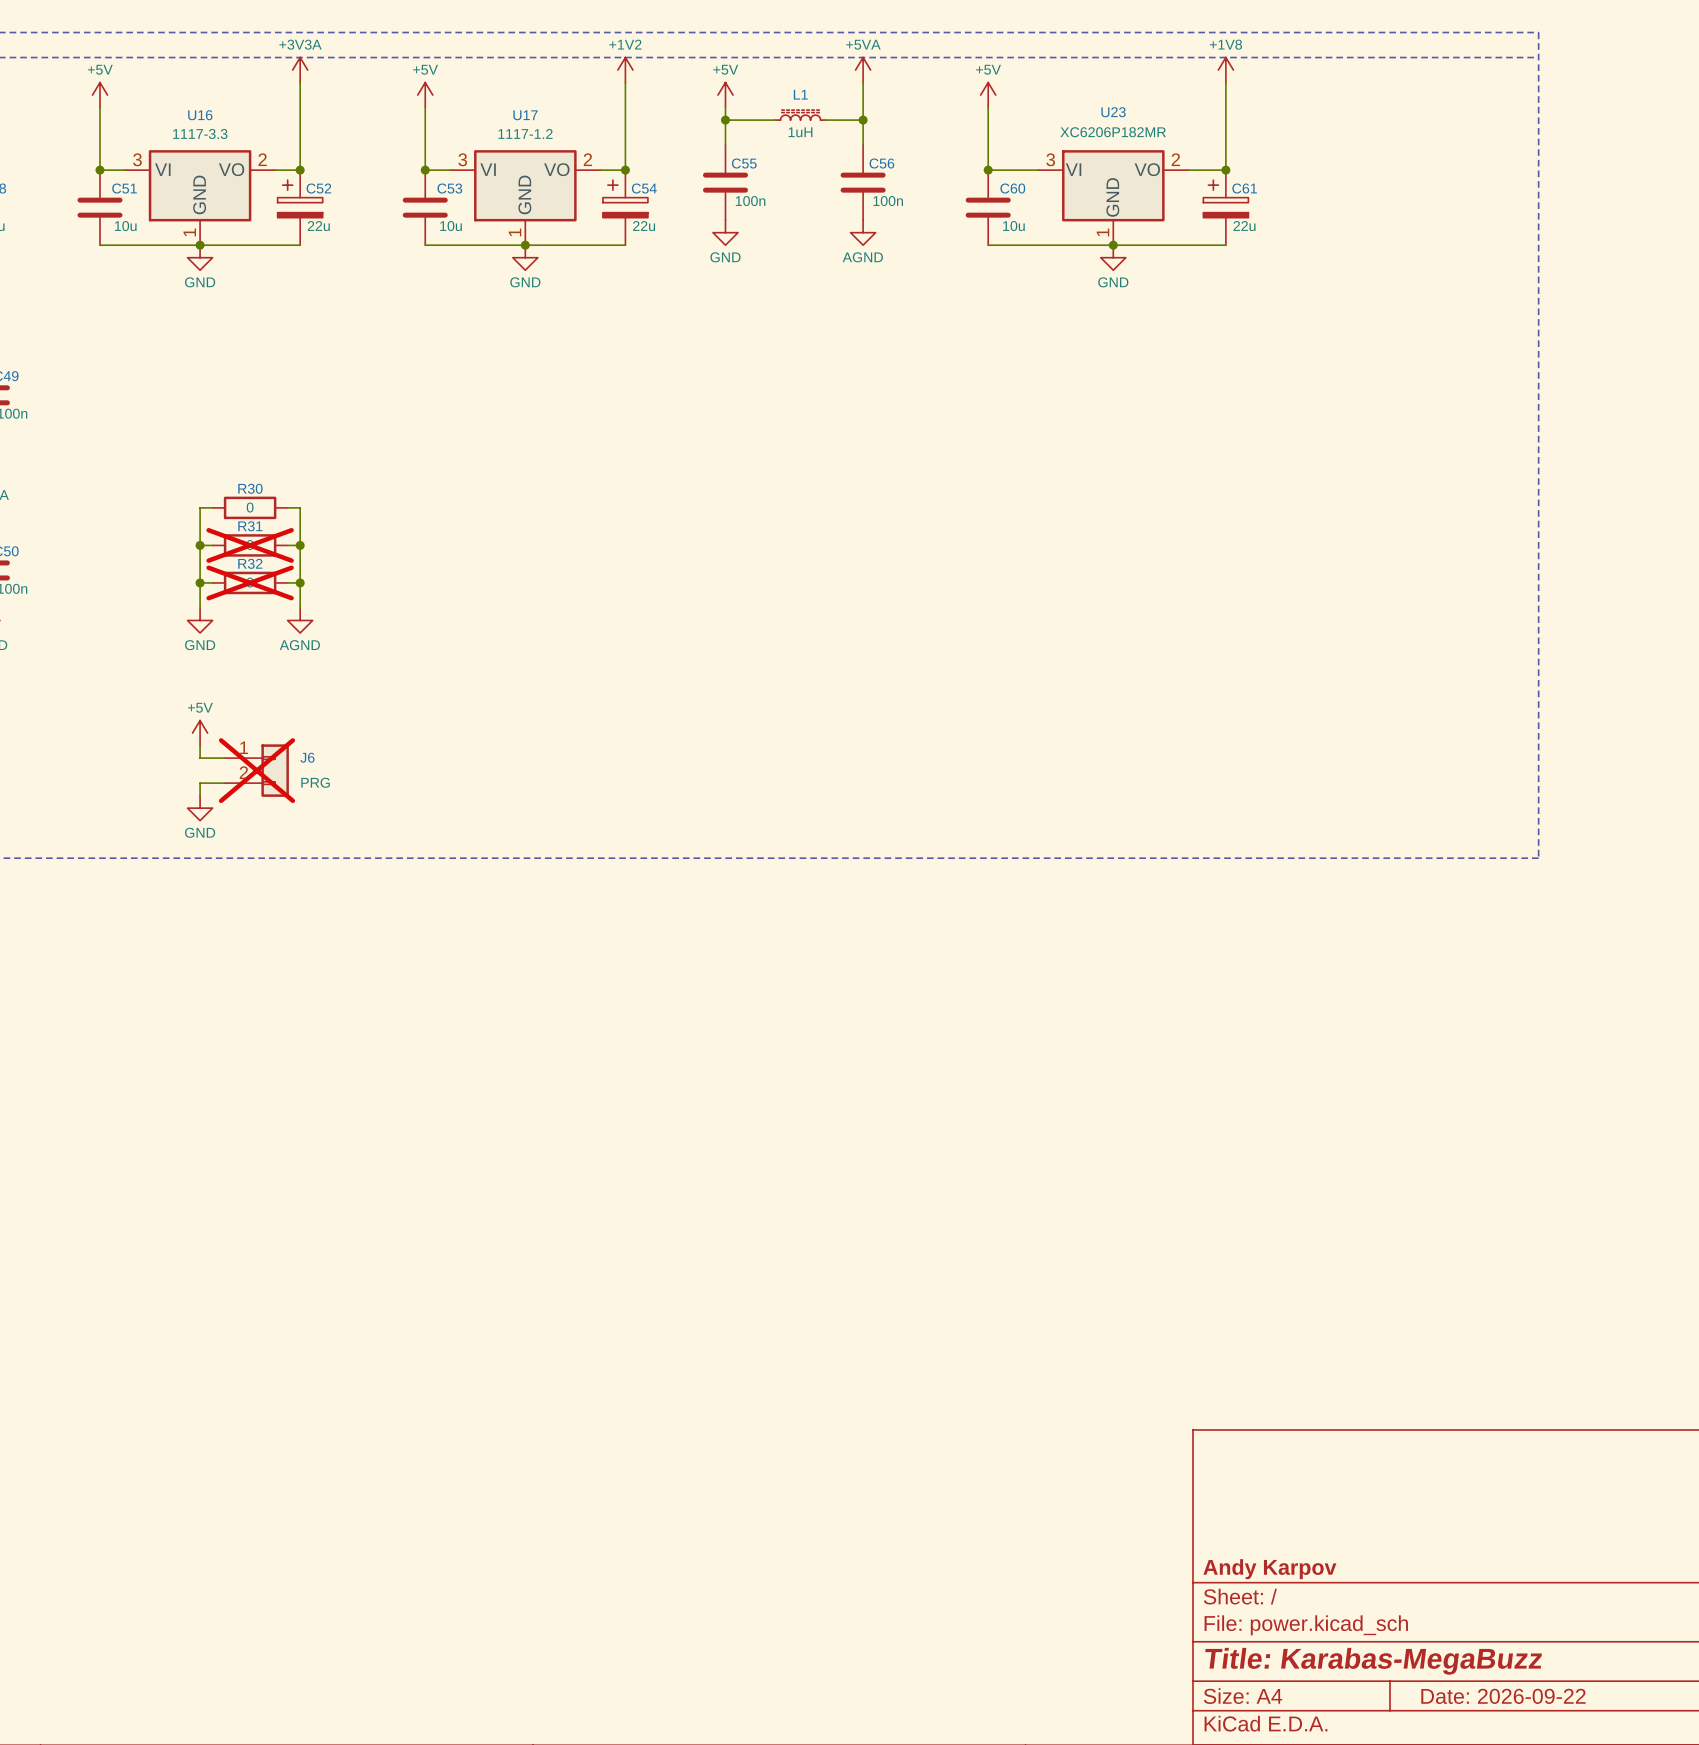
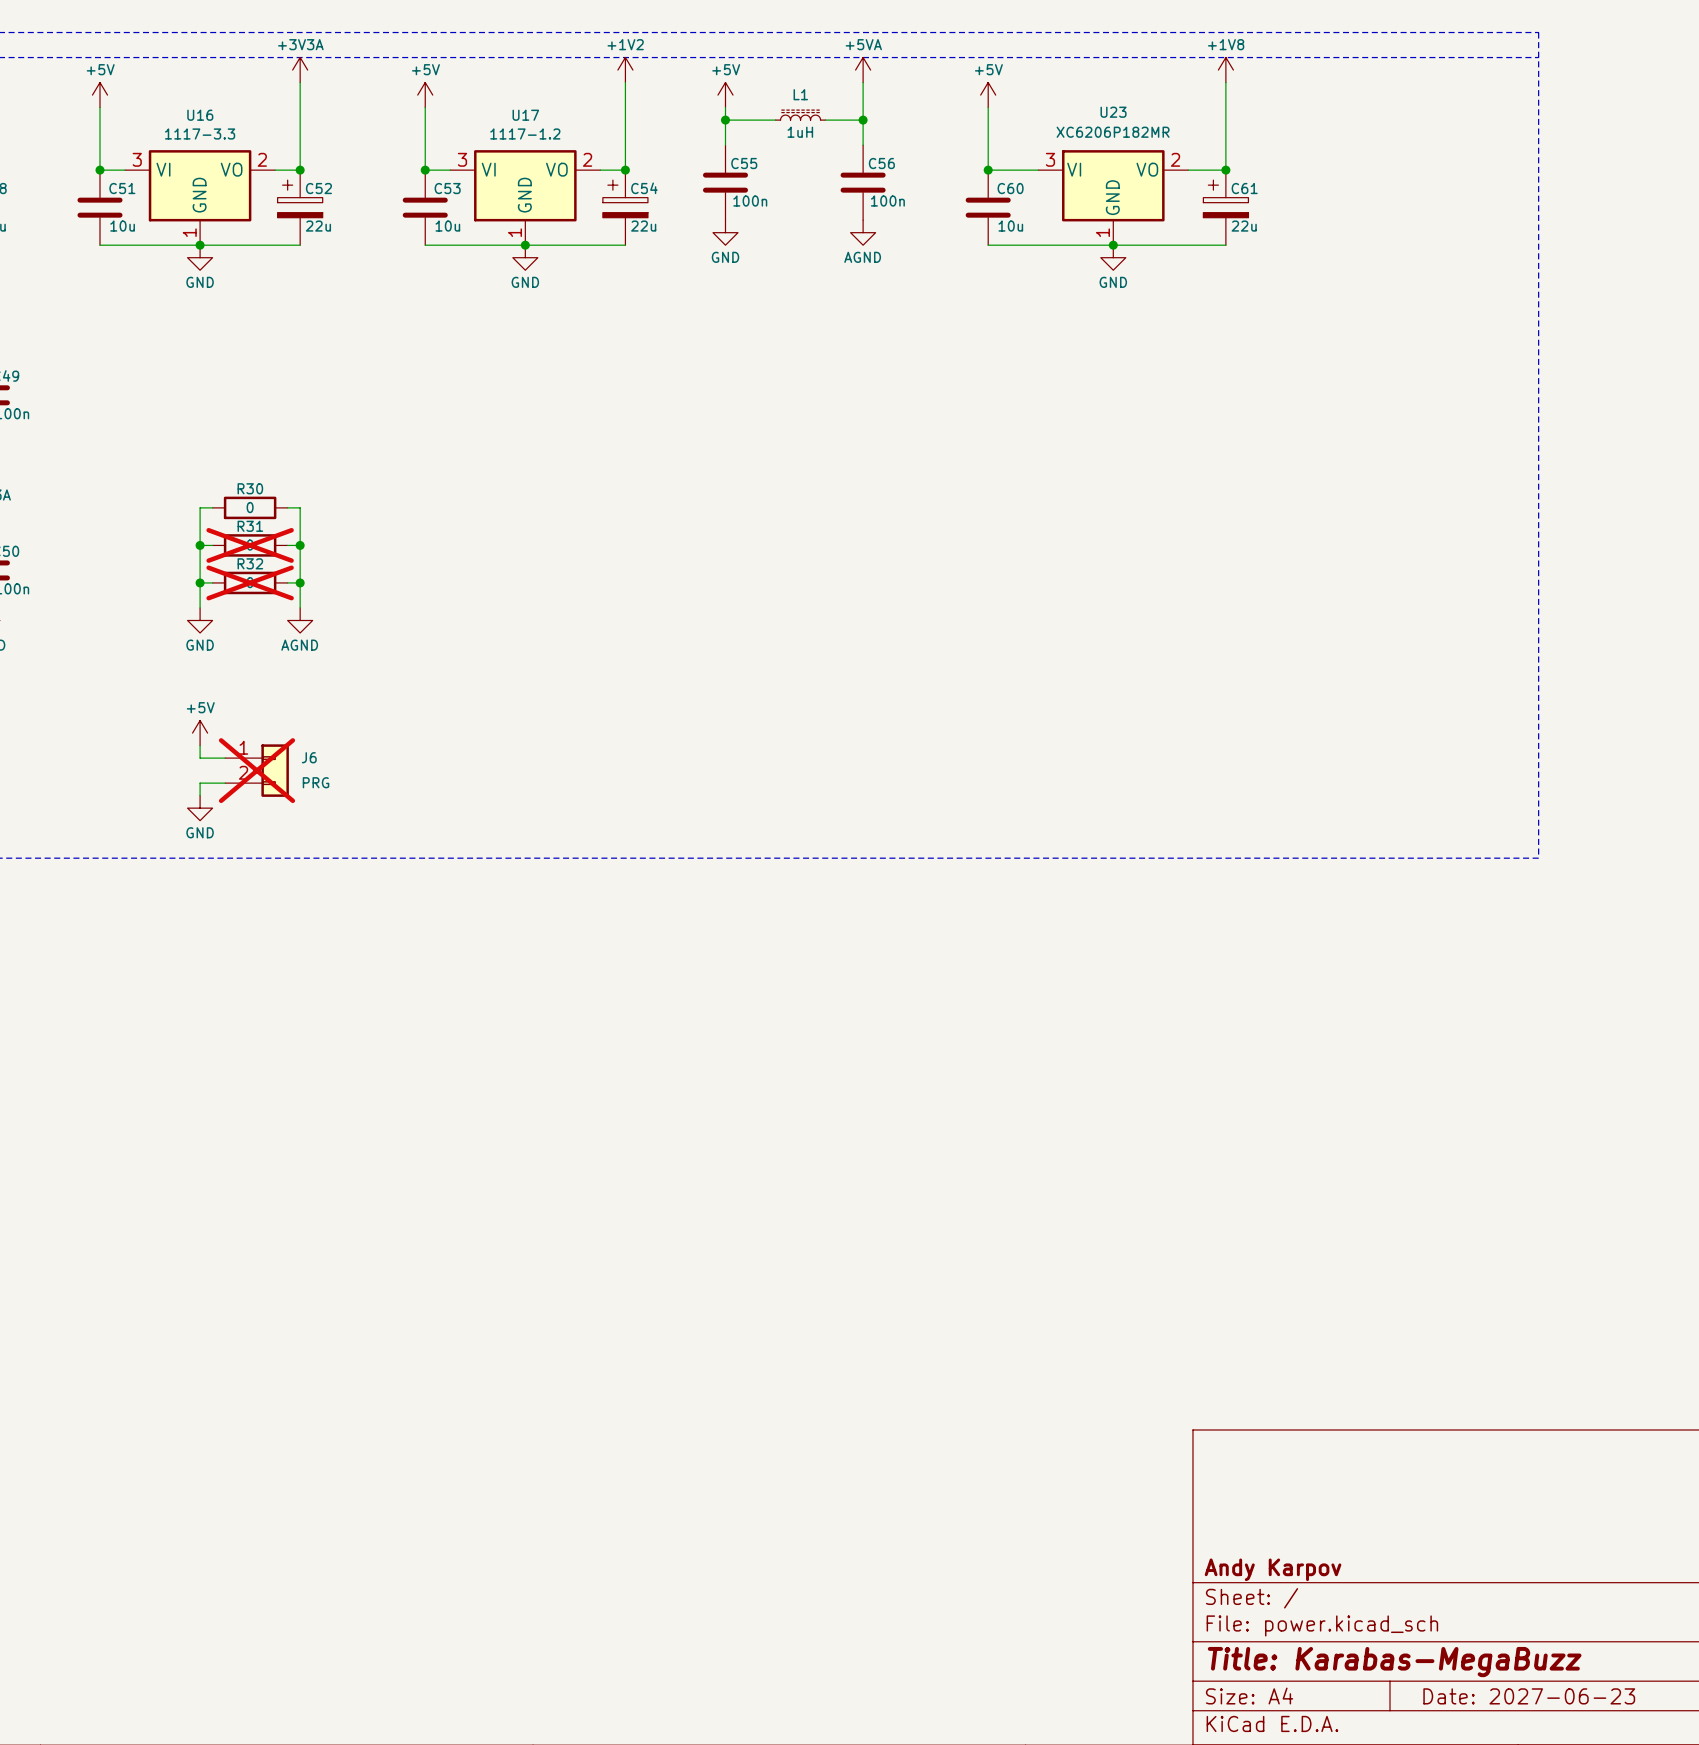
title block: Date: 2026-09-22 (1503, 1696) -> Date: 2027-06-23 (1529, 1696)

